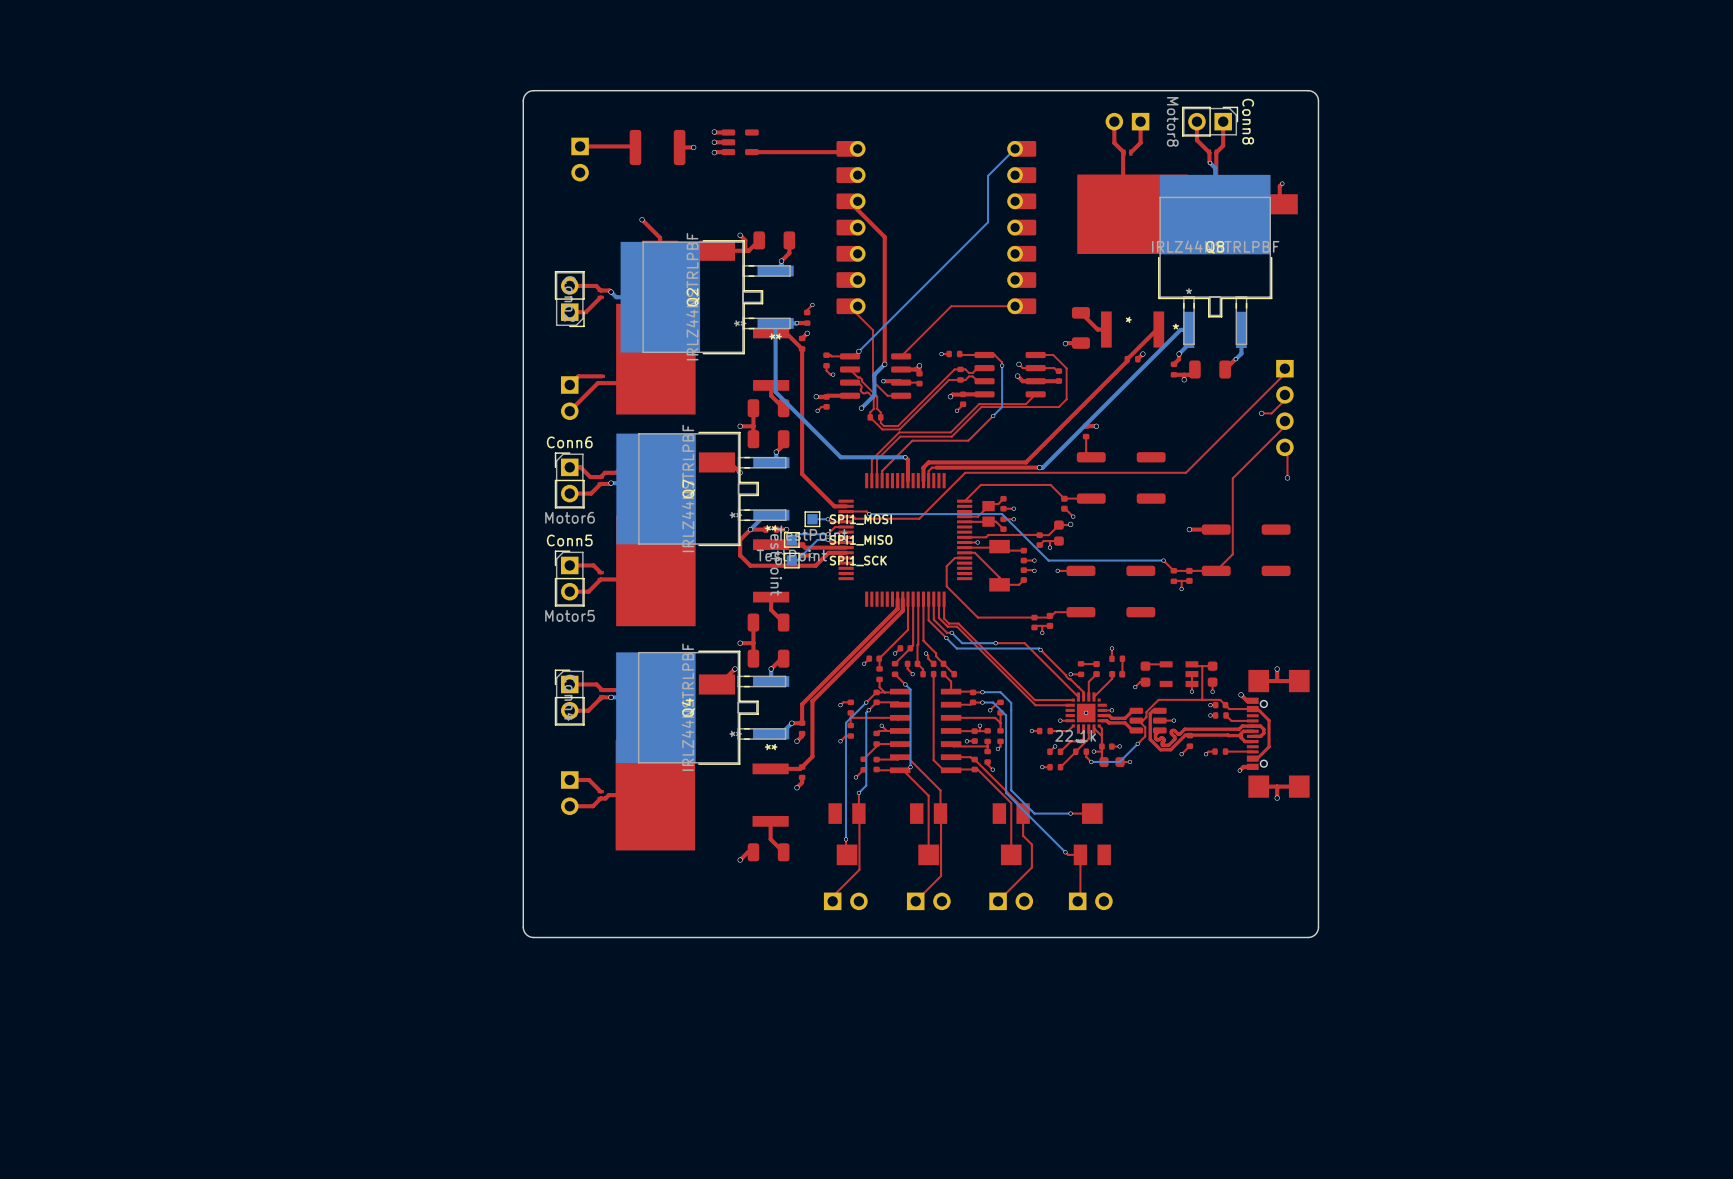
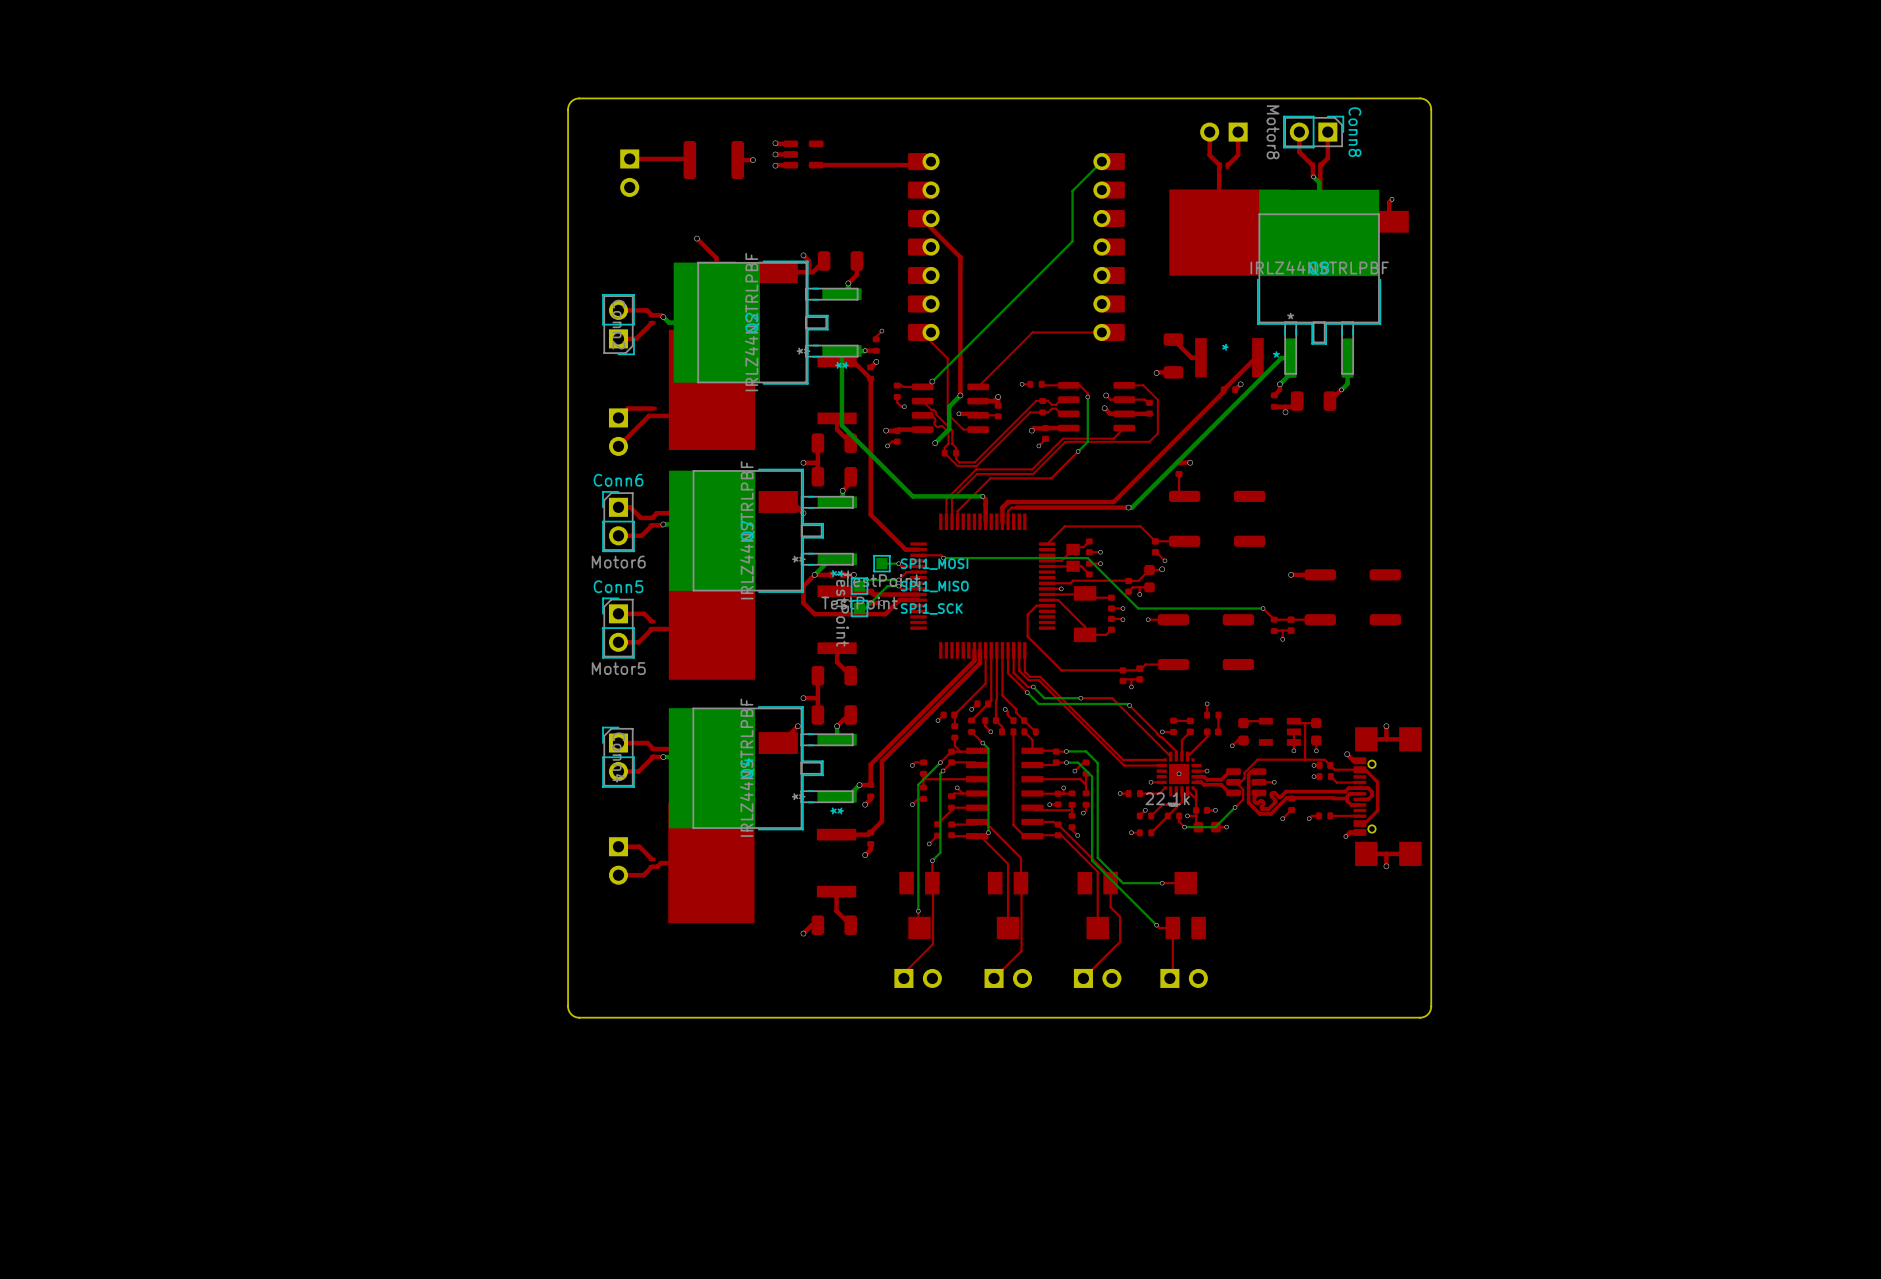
top track: (1290, 368) (1185, 472) (965, 472) (919, 518) (855, 518) (853, 516) (846, 516) -> none
top track: (1290, 394) (1271, 413) (1261, 413) -> none
part: (1284, 408) -> none
via: (1261, 413) -> none
top track: (1290, 421) (1232, 478) (1232, 554) (1216, 570) -> none
top track: (1290, 447) (1287, 449) (1287, 477) -> none
via: (1287, 477) -> none

